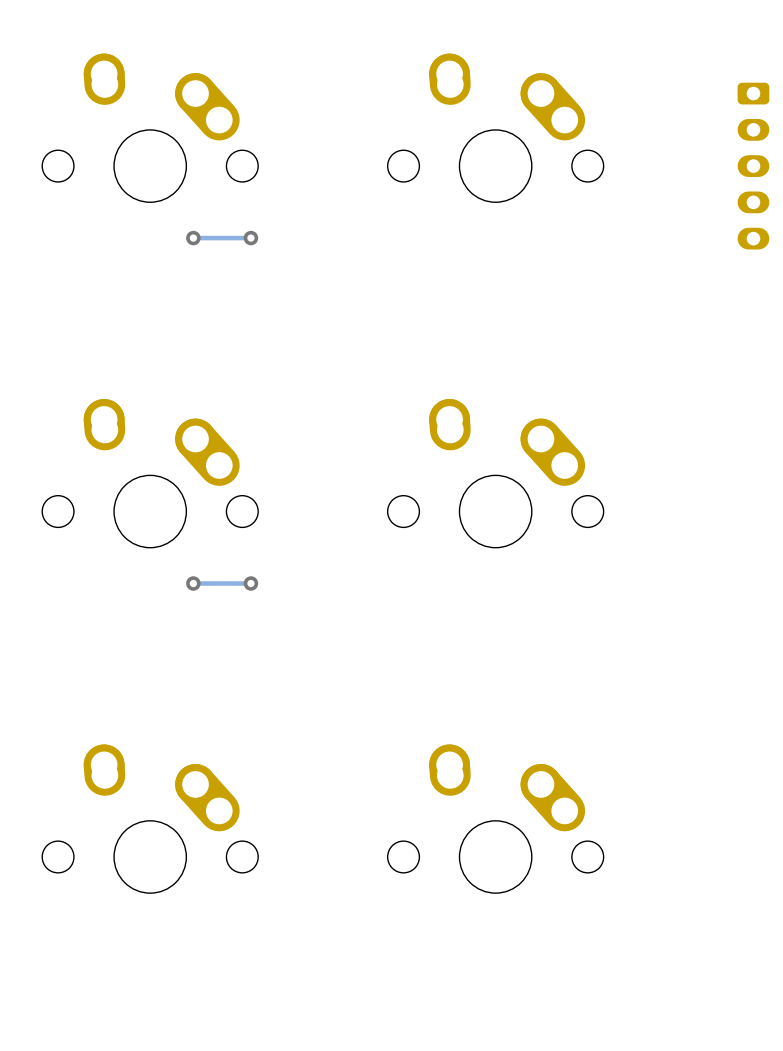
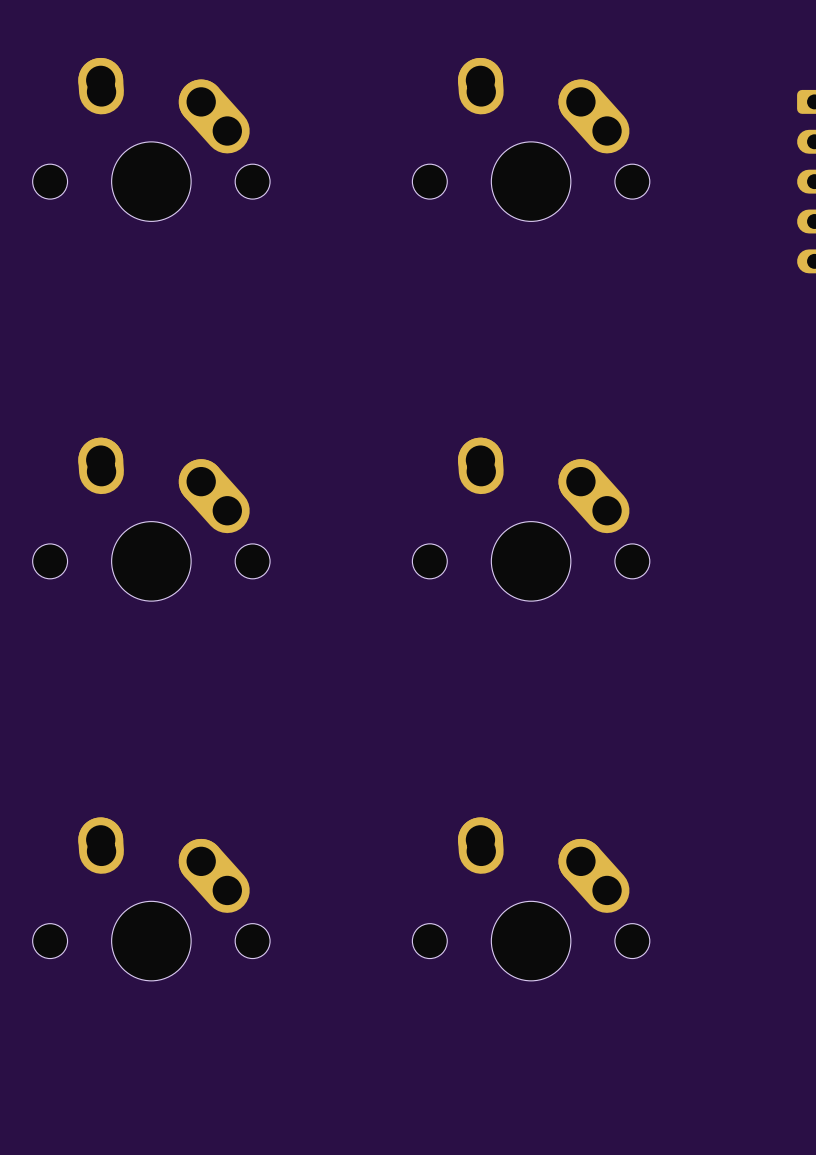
via: (193, 238) -> none
track: (250, 238) (193, 238) -> none
via: (250, 238) -> none
via: (193, 583) -> none
track: (250, 583) (193, 583) -> none
via: (250, 583) -> none

